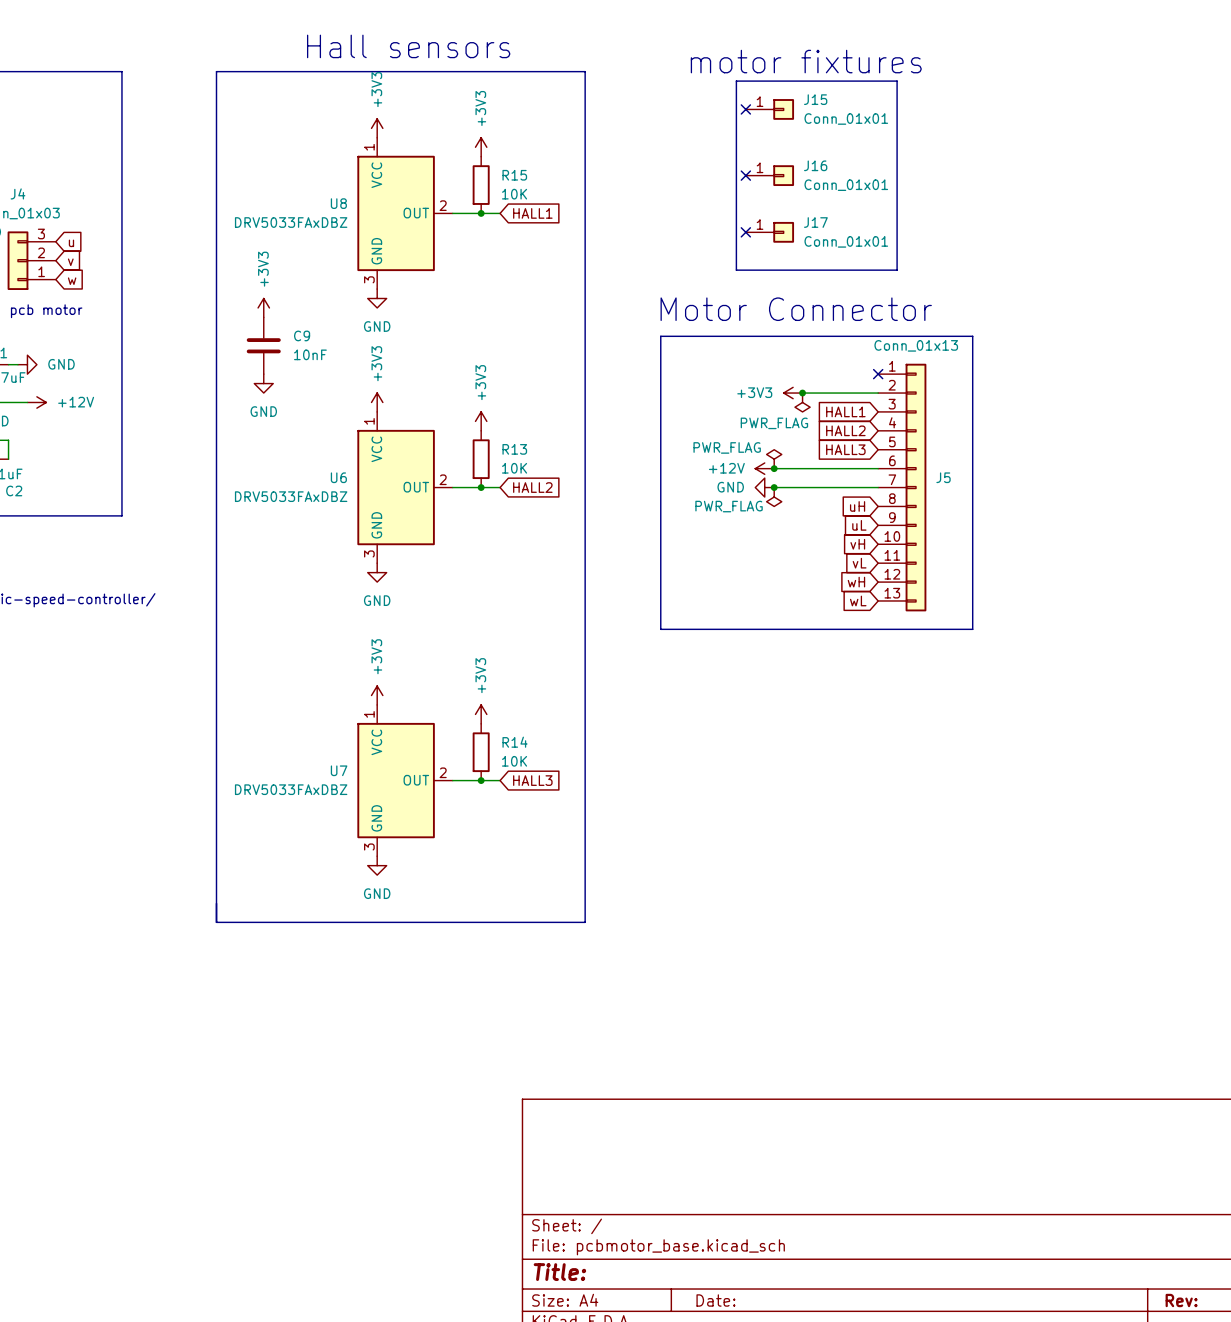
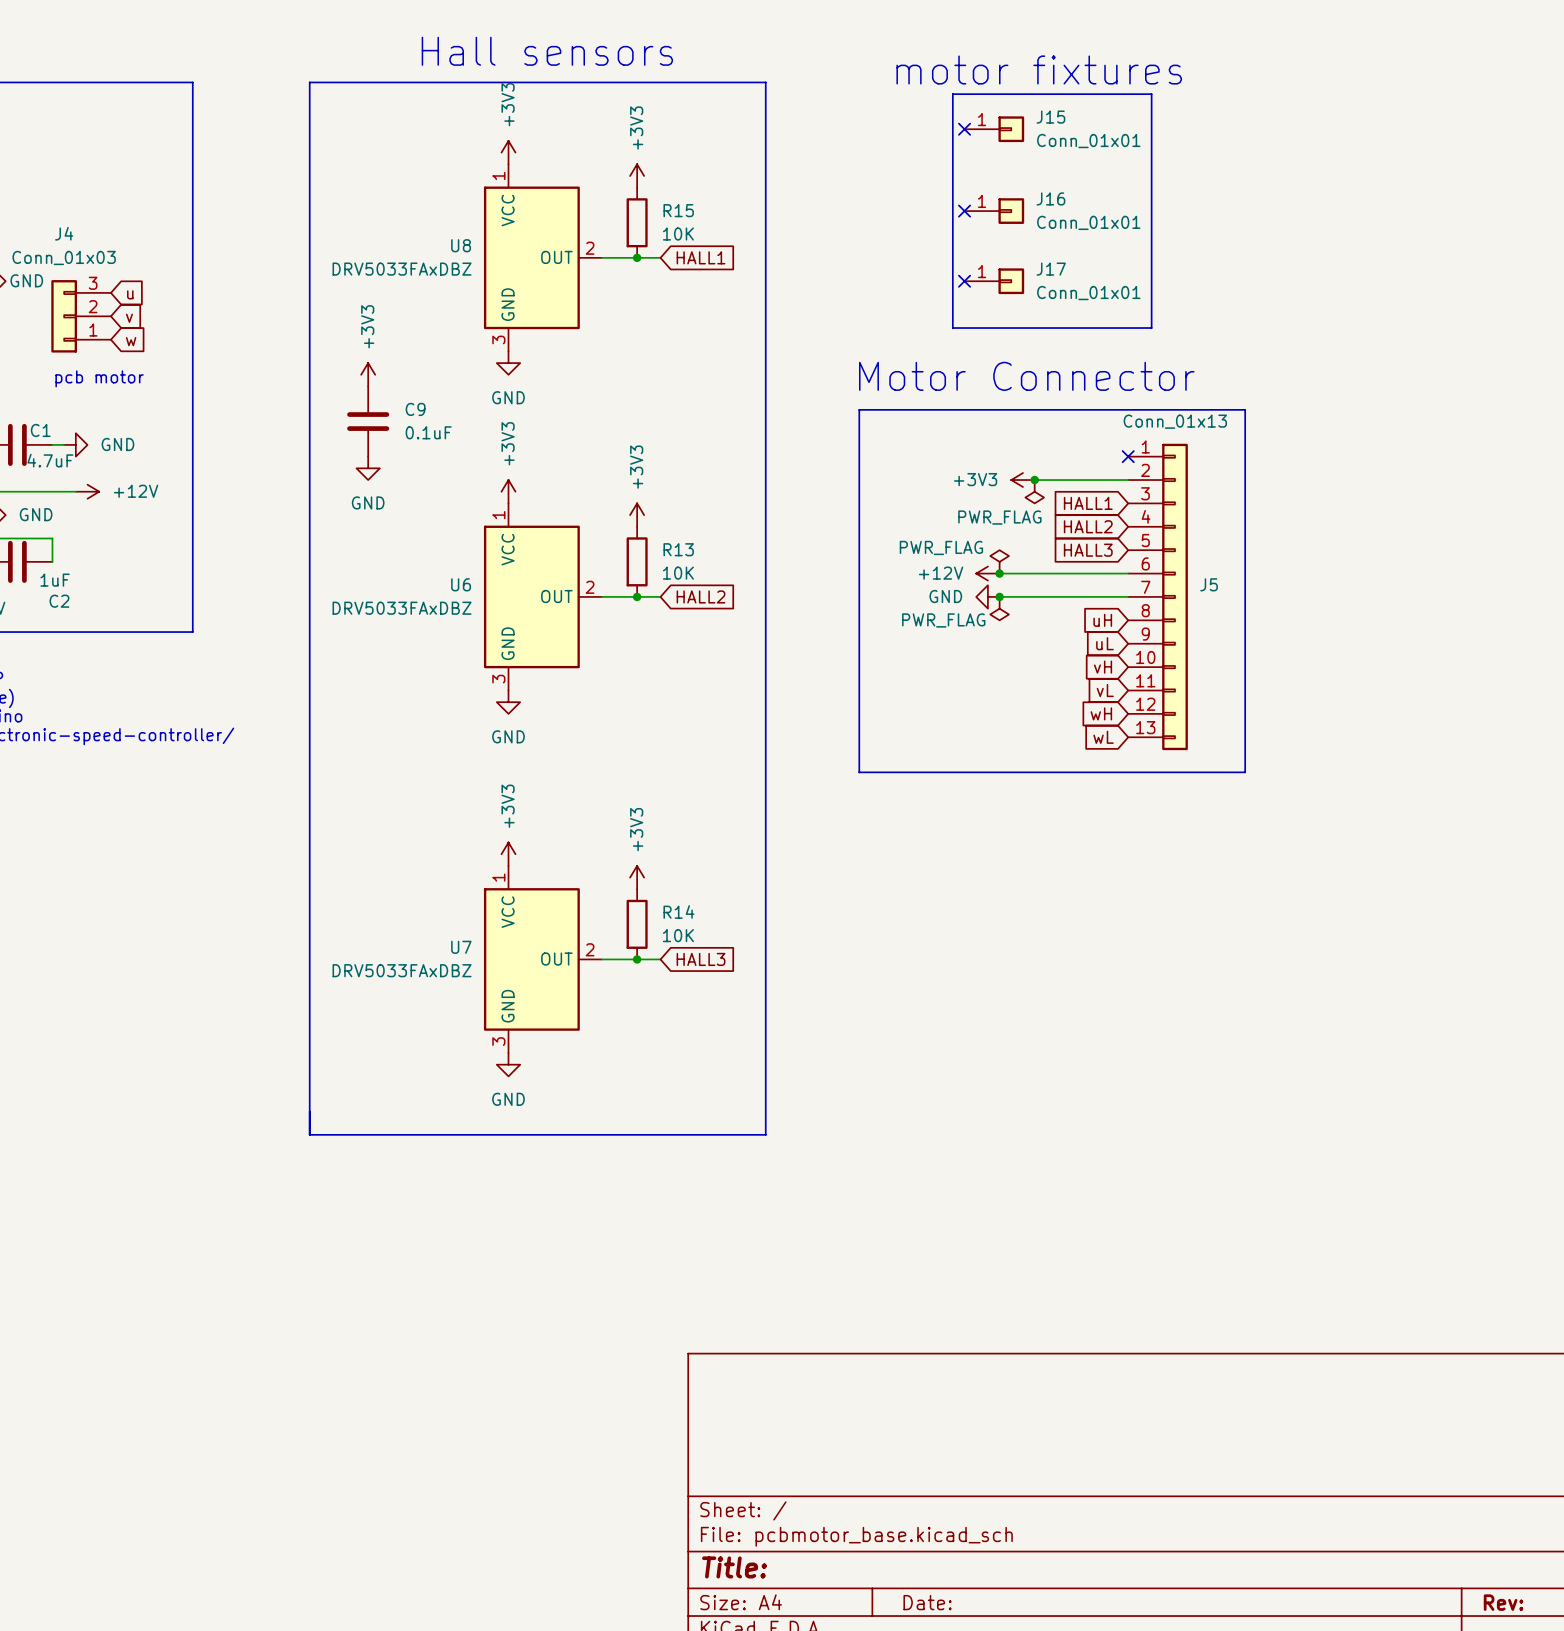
C9 value: 10nF (310, 354) -> 0.1uF (428, 432)

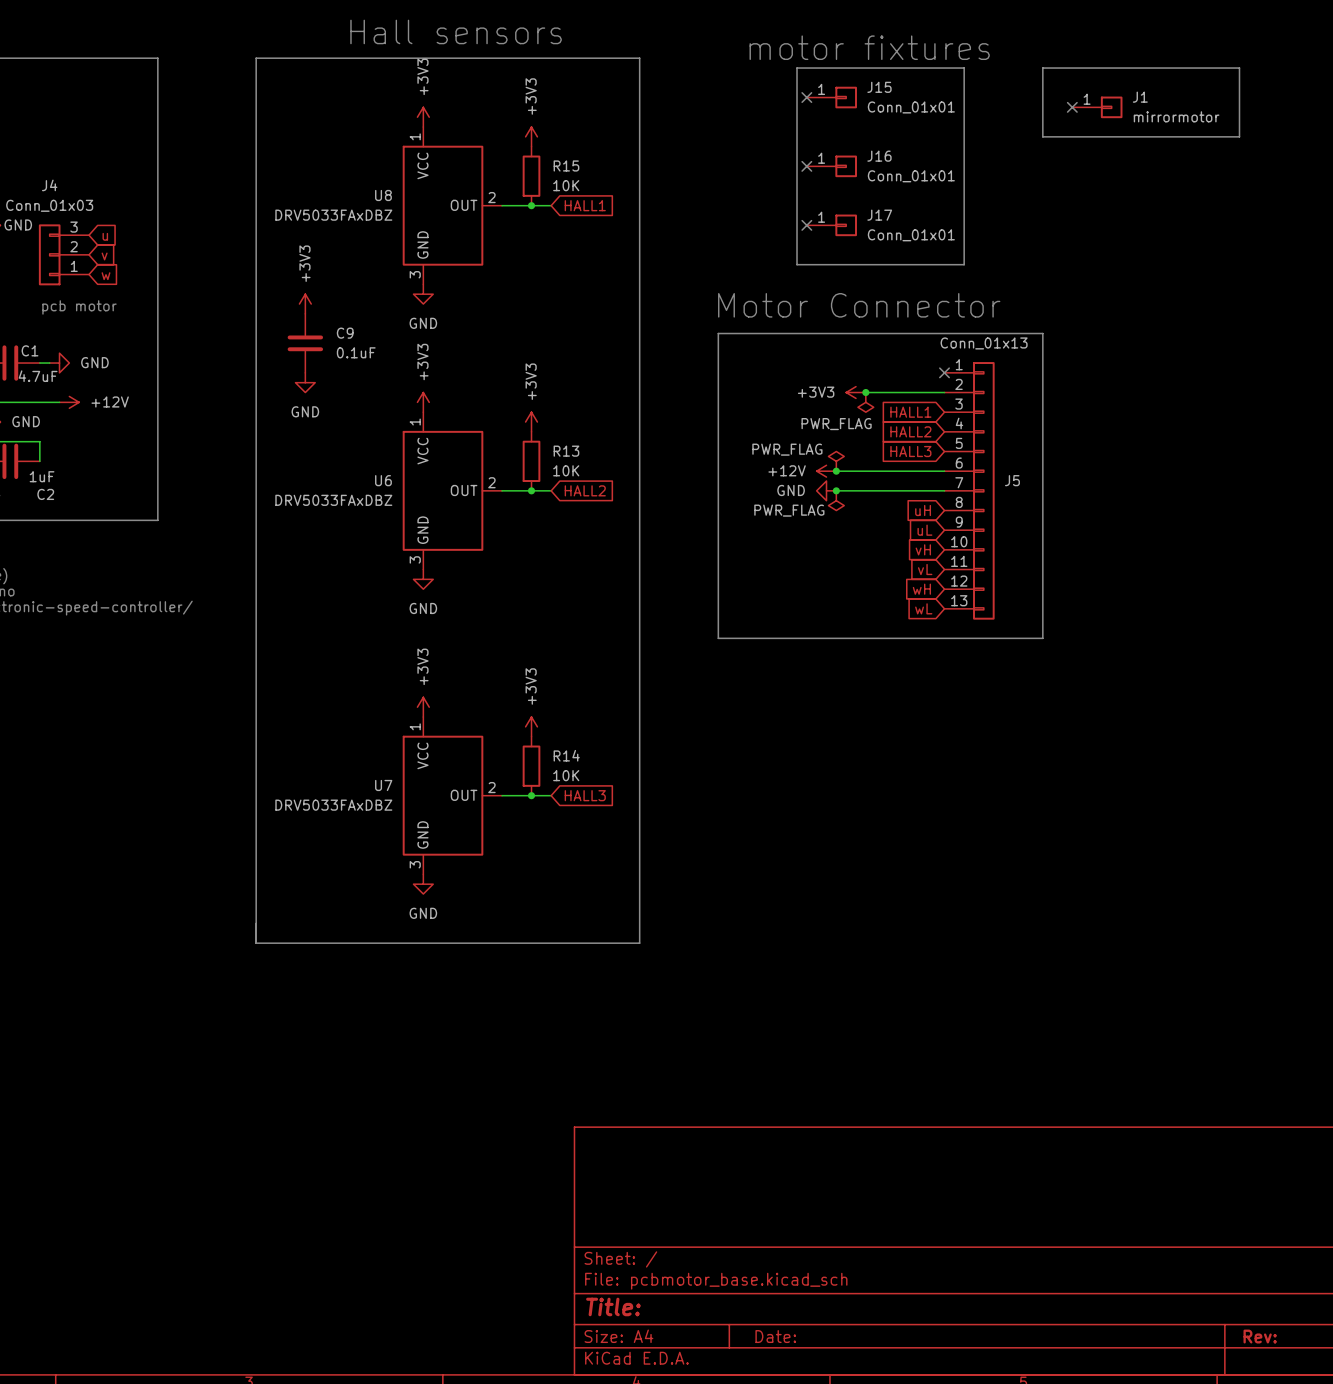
line: none -> (1042, 68) (1239, 68) (1239, 136) (1042, 136) (1042, 68)
no-connect mark: none -> (1072, 107)
J1: none -> mirrormotor (1097, 107)

